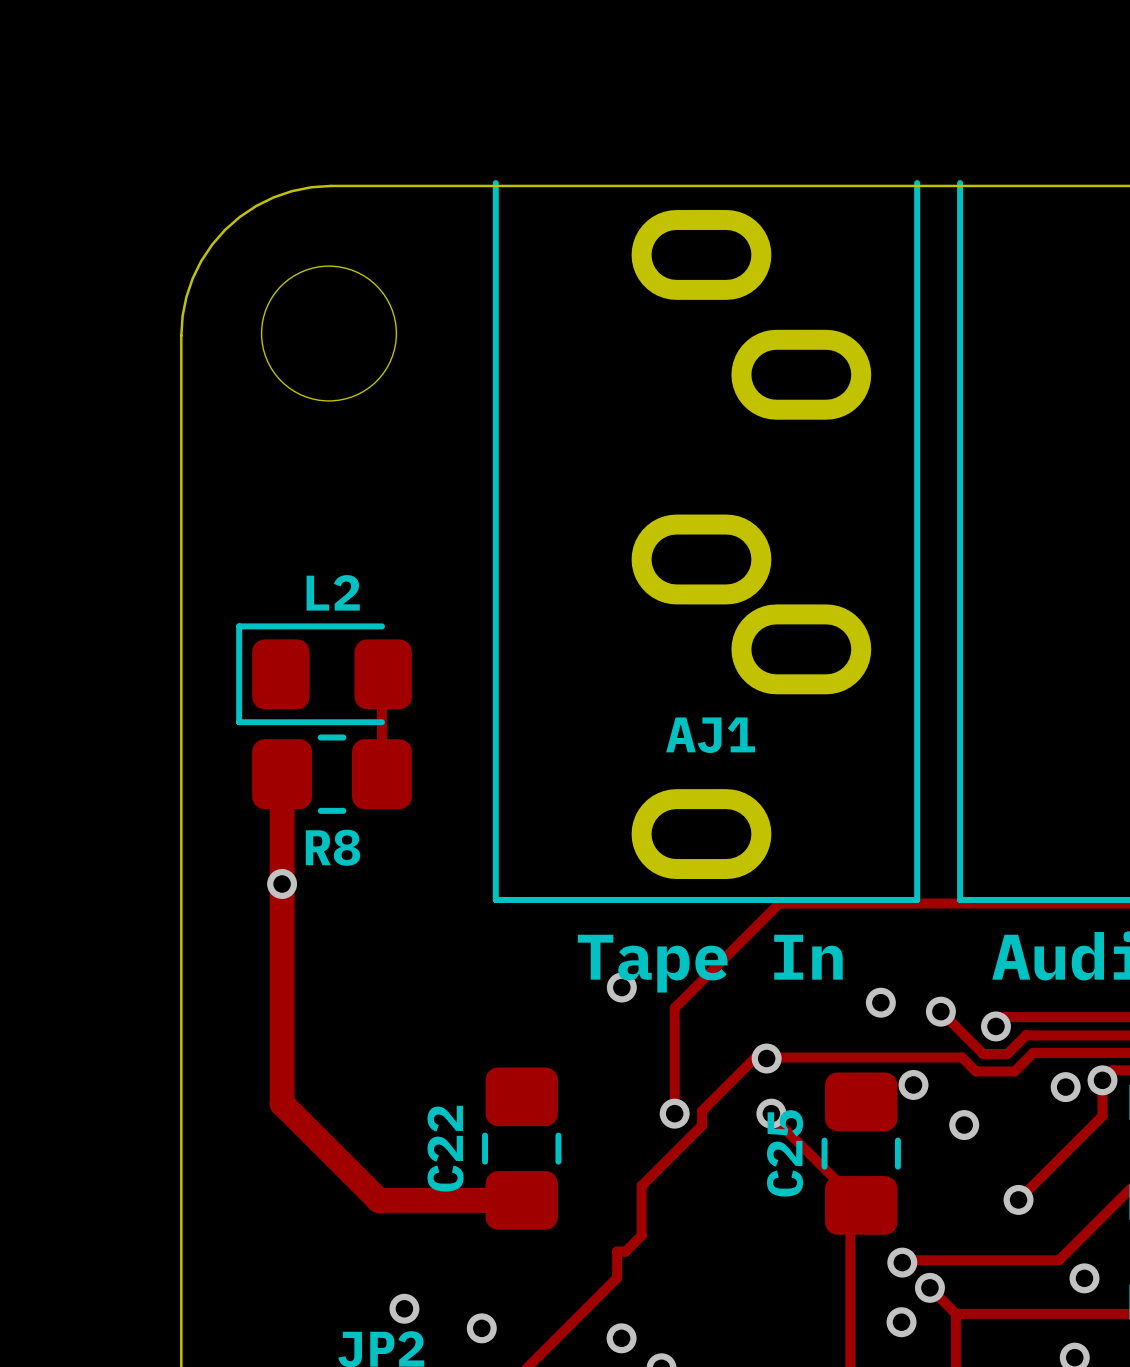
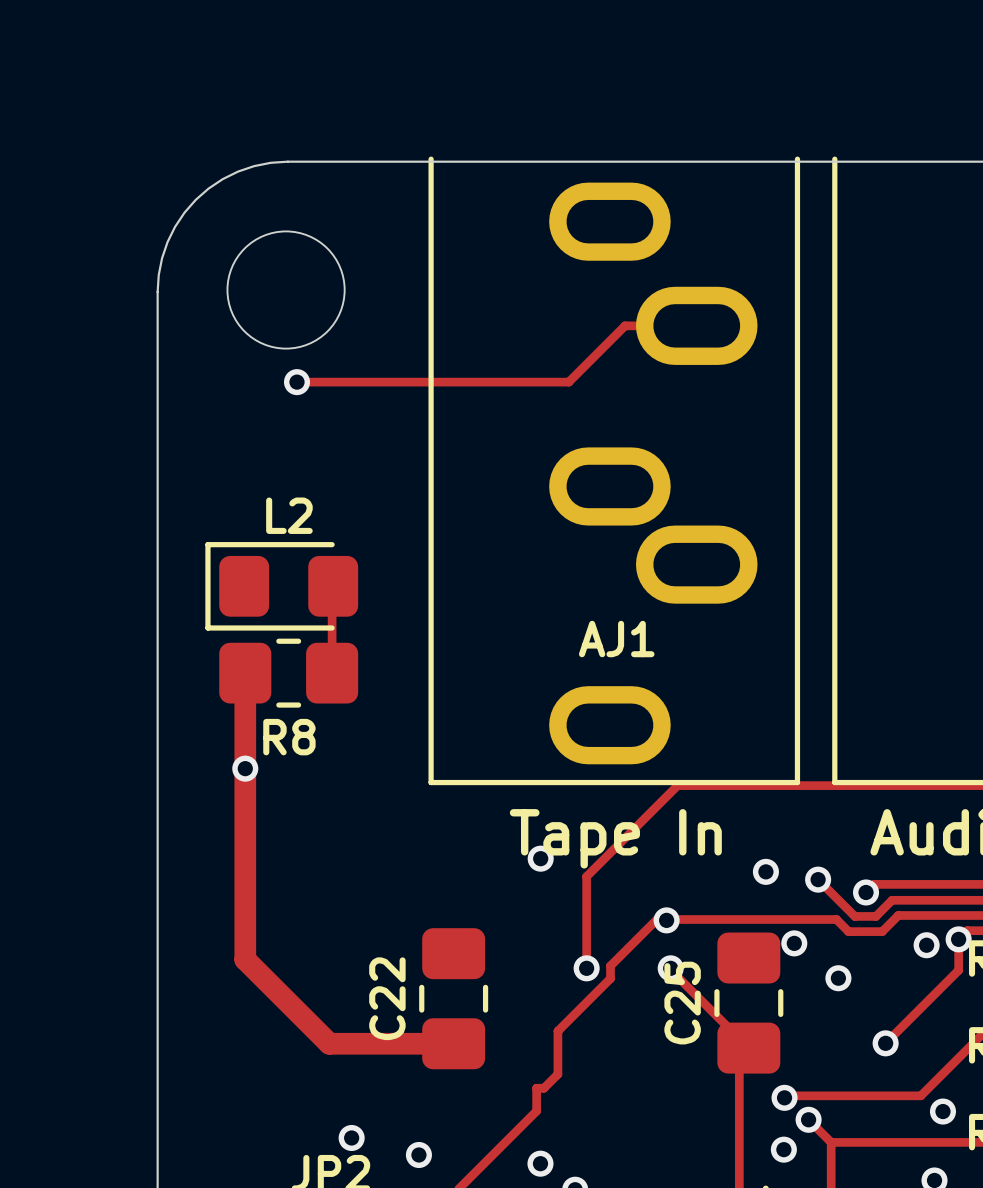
track: none -> (696, 325) (625, 325) (568, 382) (297, 382)
via: none -> (297, 382)

